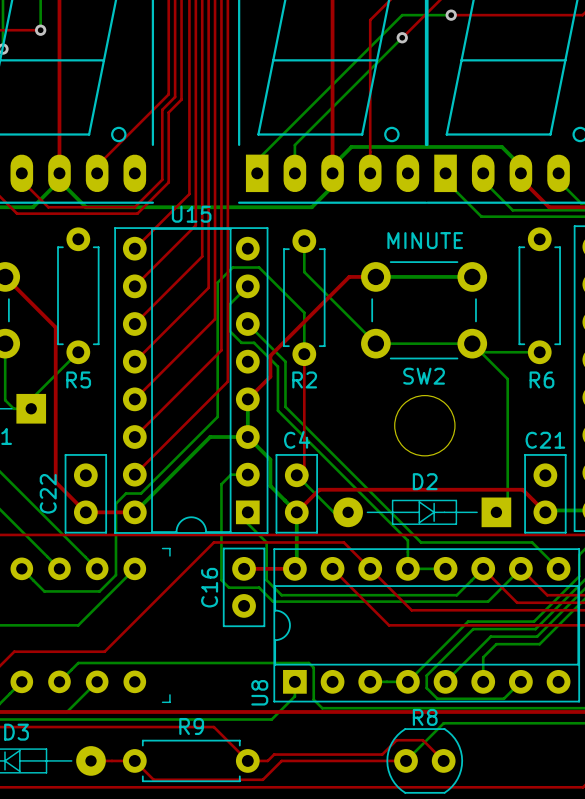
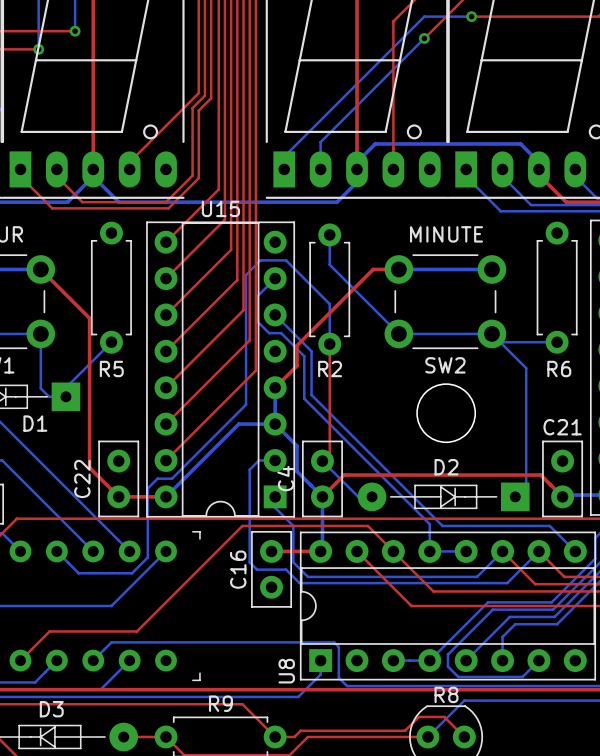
C4 name rotation: 0° (297, 439) -> 90° counterclockwise (285, 478)
C4 name position: C4 (297, 439) -> C4 (285, 478)

